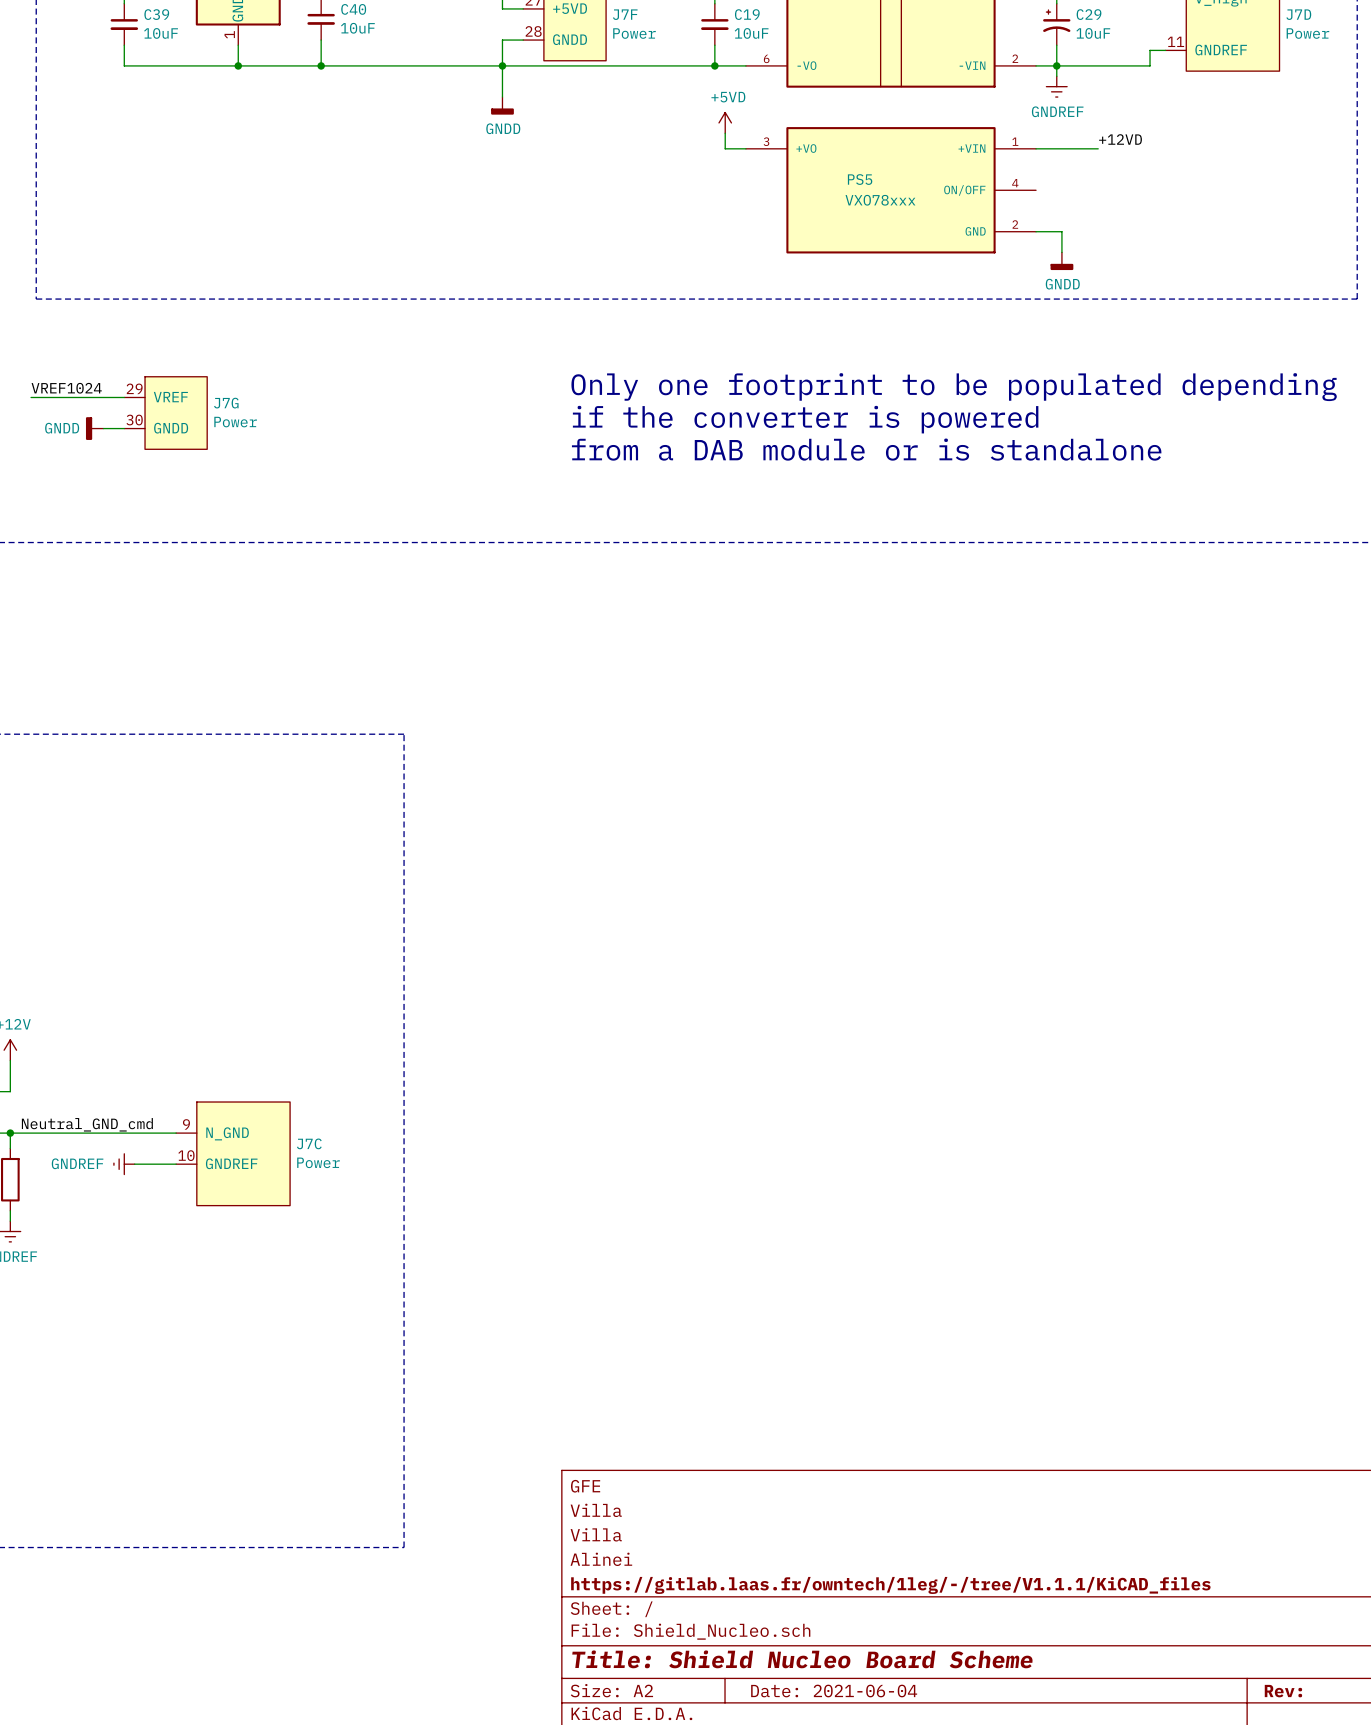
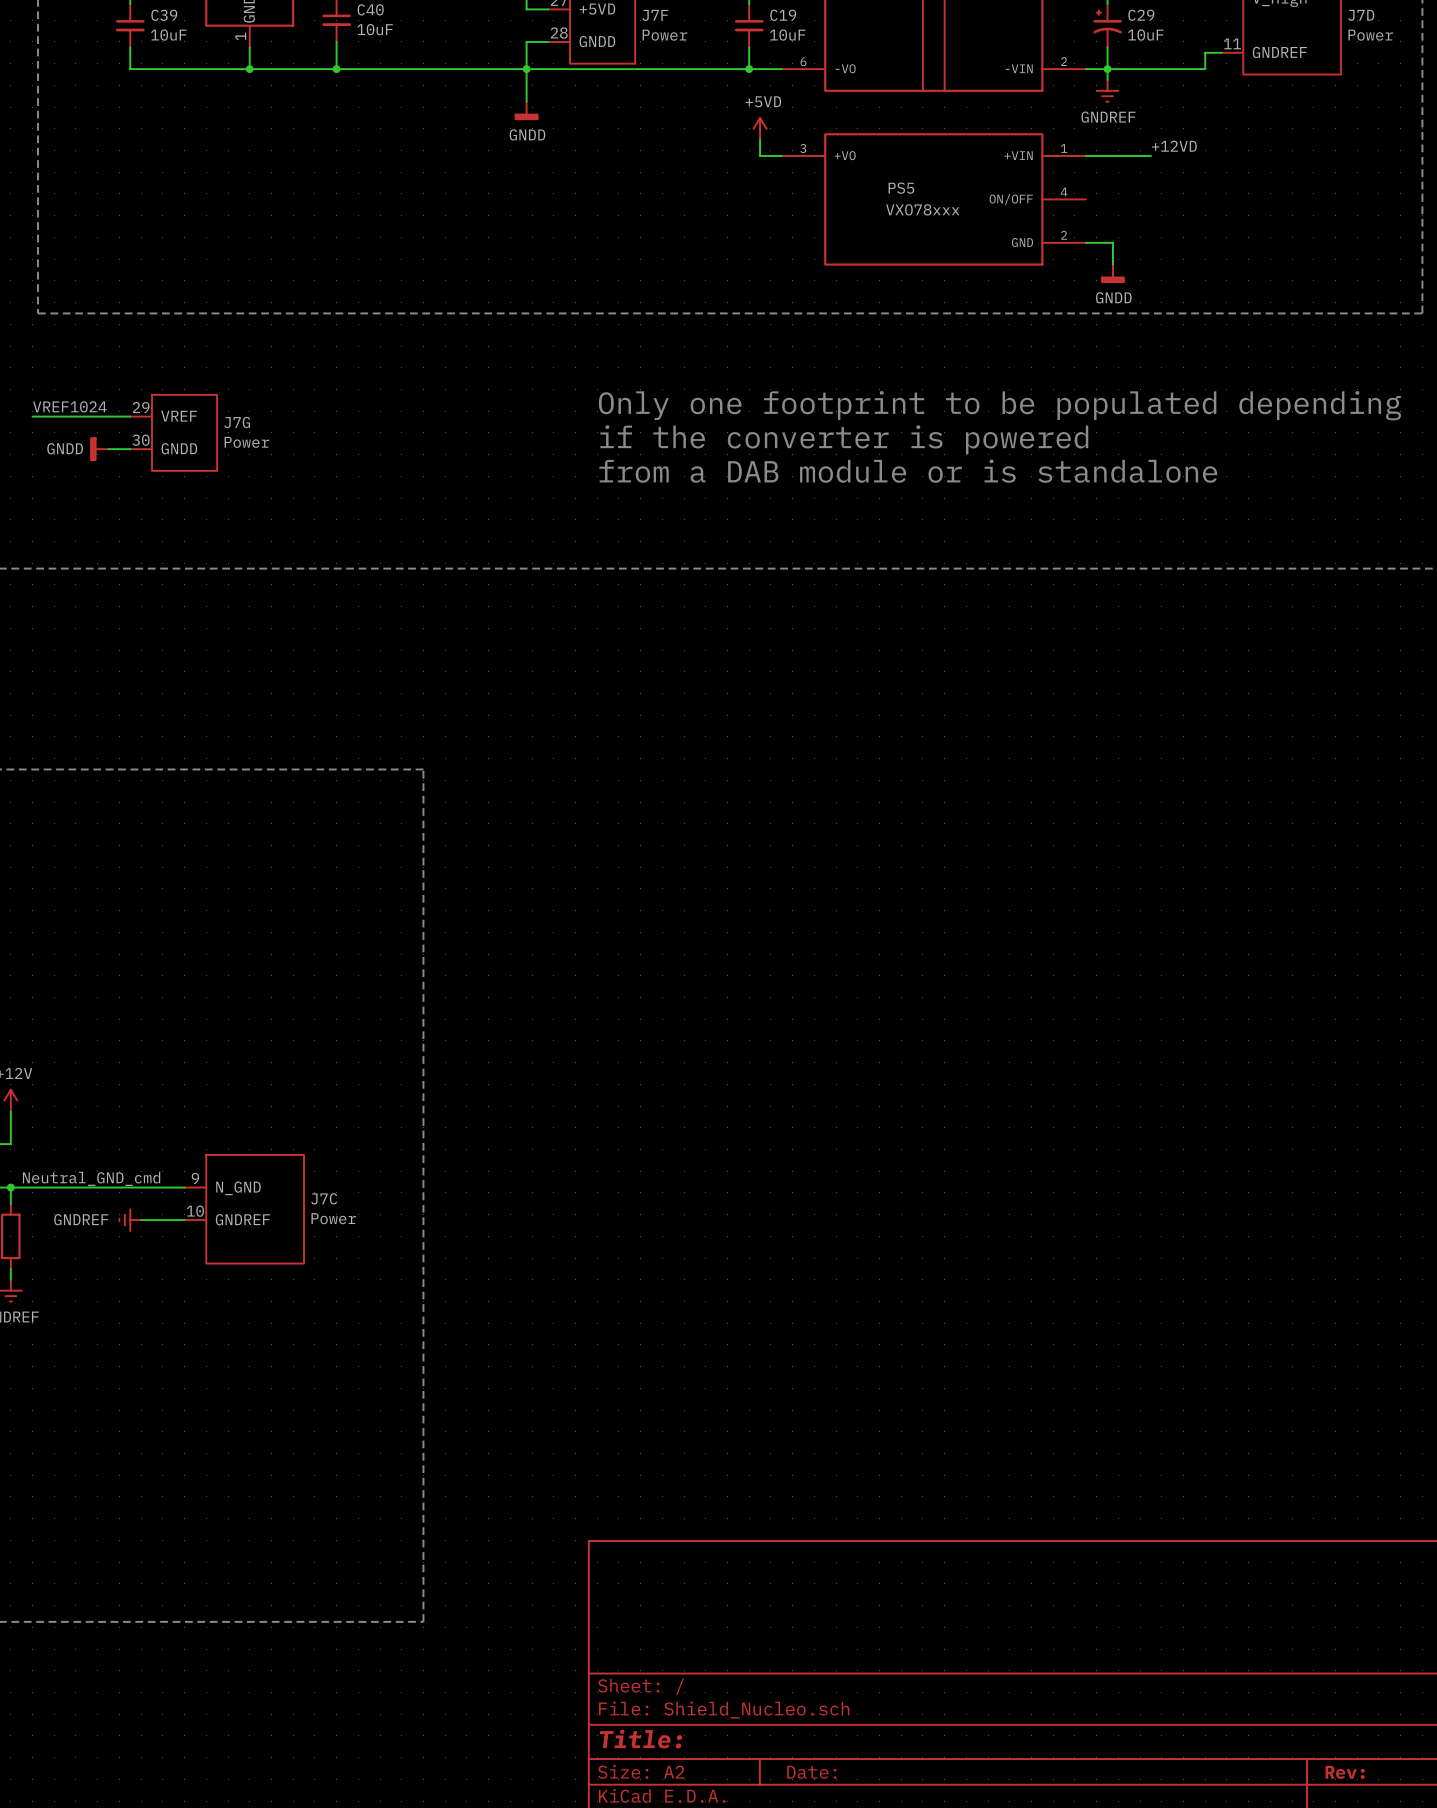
title block: GFE (585, 1486) -> none
title block: Villa (596, 1510) -> none
title block: Villa (596, 1534) -> none
title block: Alinei (601, 1559) -> none
title block: https://gitlab.laas.fr/owntech/1leg/-/tree/V1.1.1/KiCAD_files (890, 1585) -> none
title block: Title: Shield Nucleo Board Scheme (802, 1659) -> Title: (641, 1739)
title block: Date: 2021-06-04 (834, 1691) -> Date: (811, 1772)

